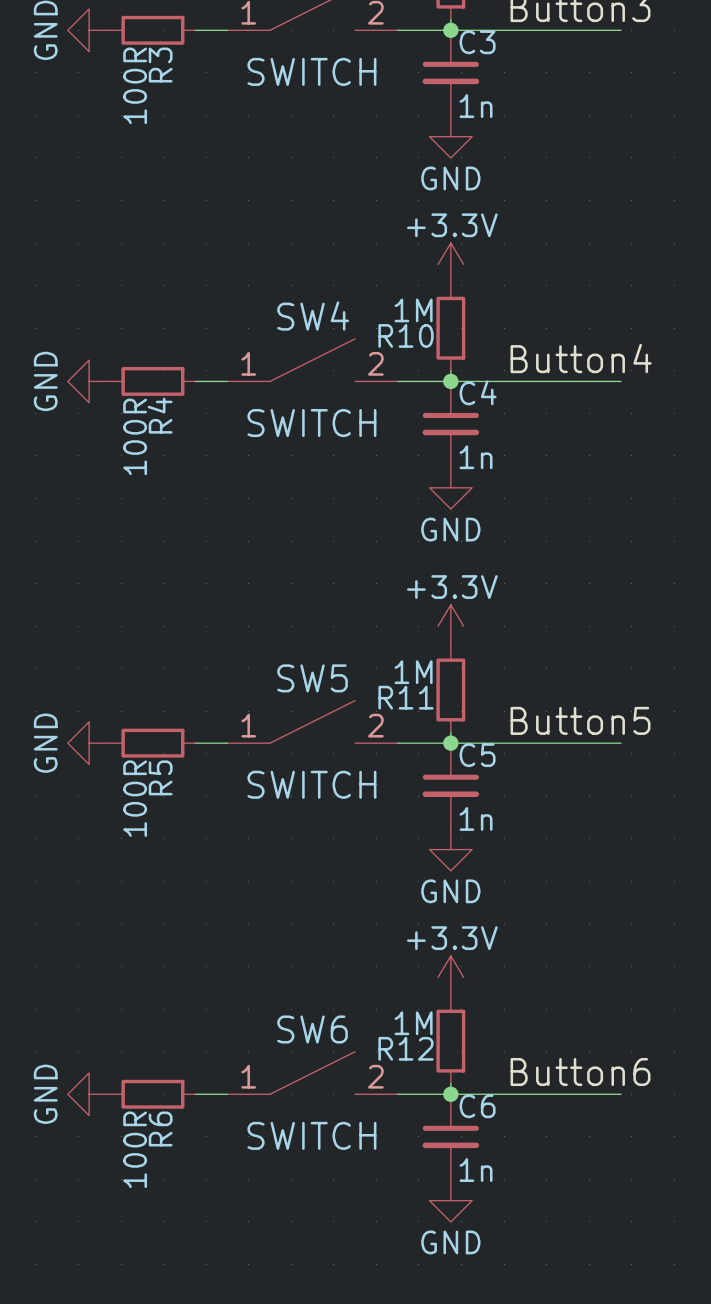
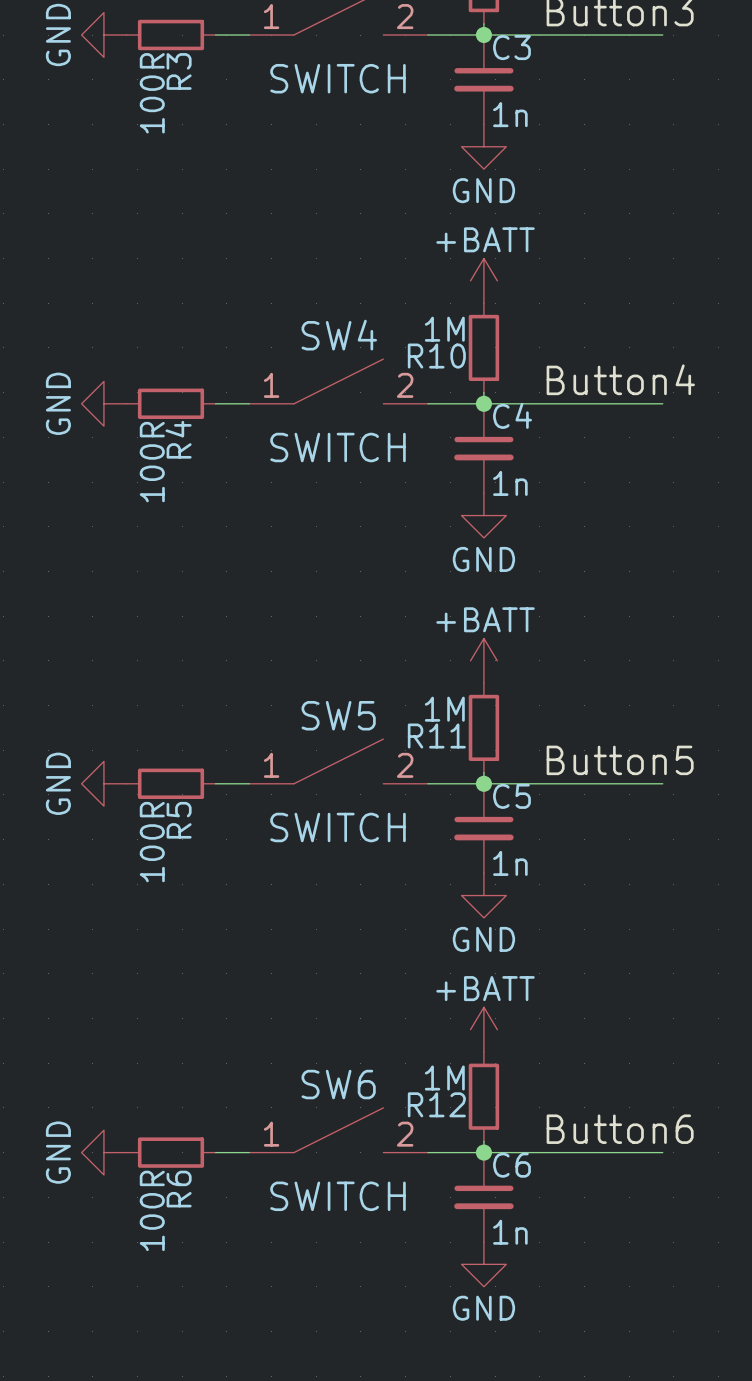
power symbol: +3.3V (450, 264) -> +BATT (483, 280)
power symbol: +3.3V (450, 626) -> +BATT (483, 660)
power symbol: +3.3V (450, 977) -> +BATT (483, 1029)

